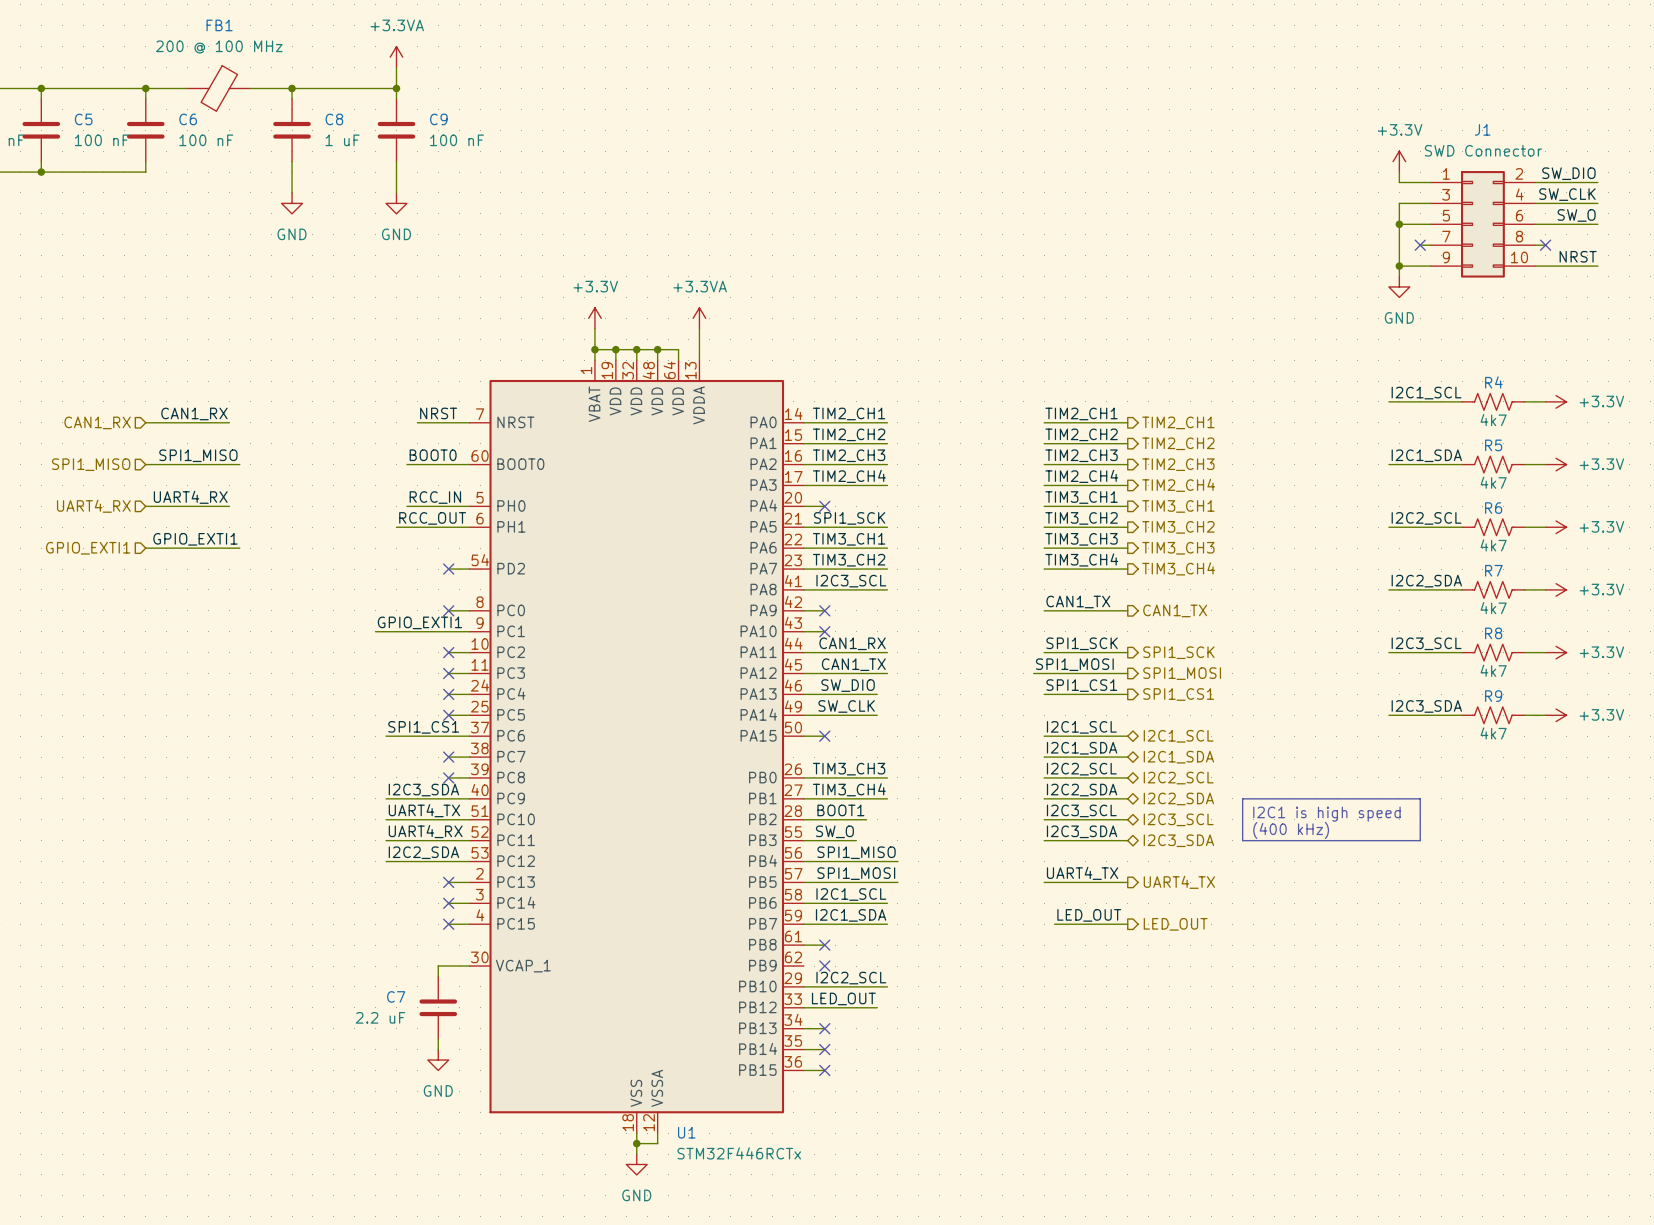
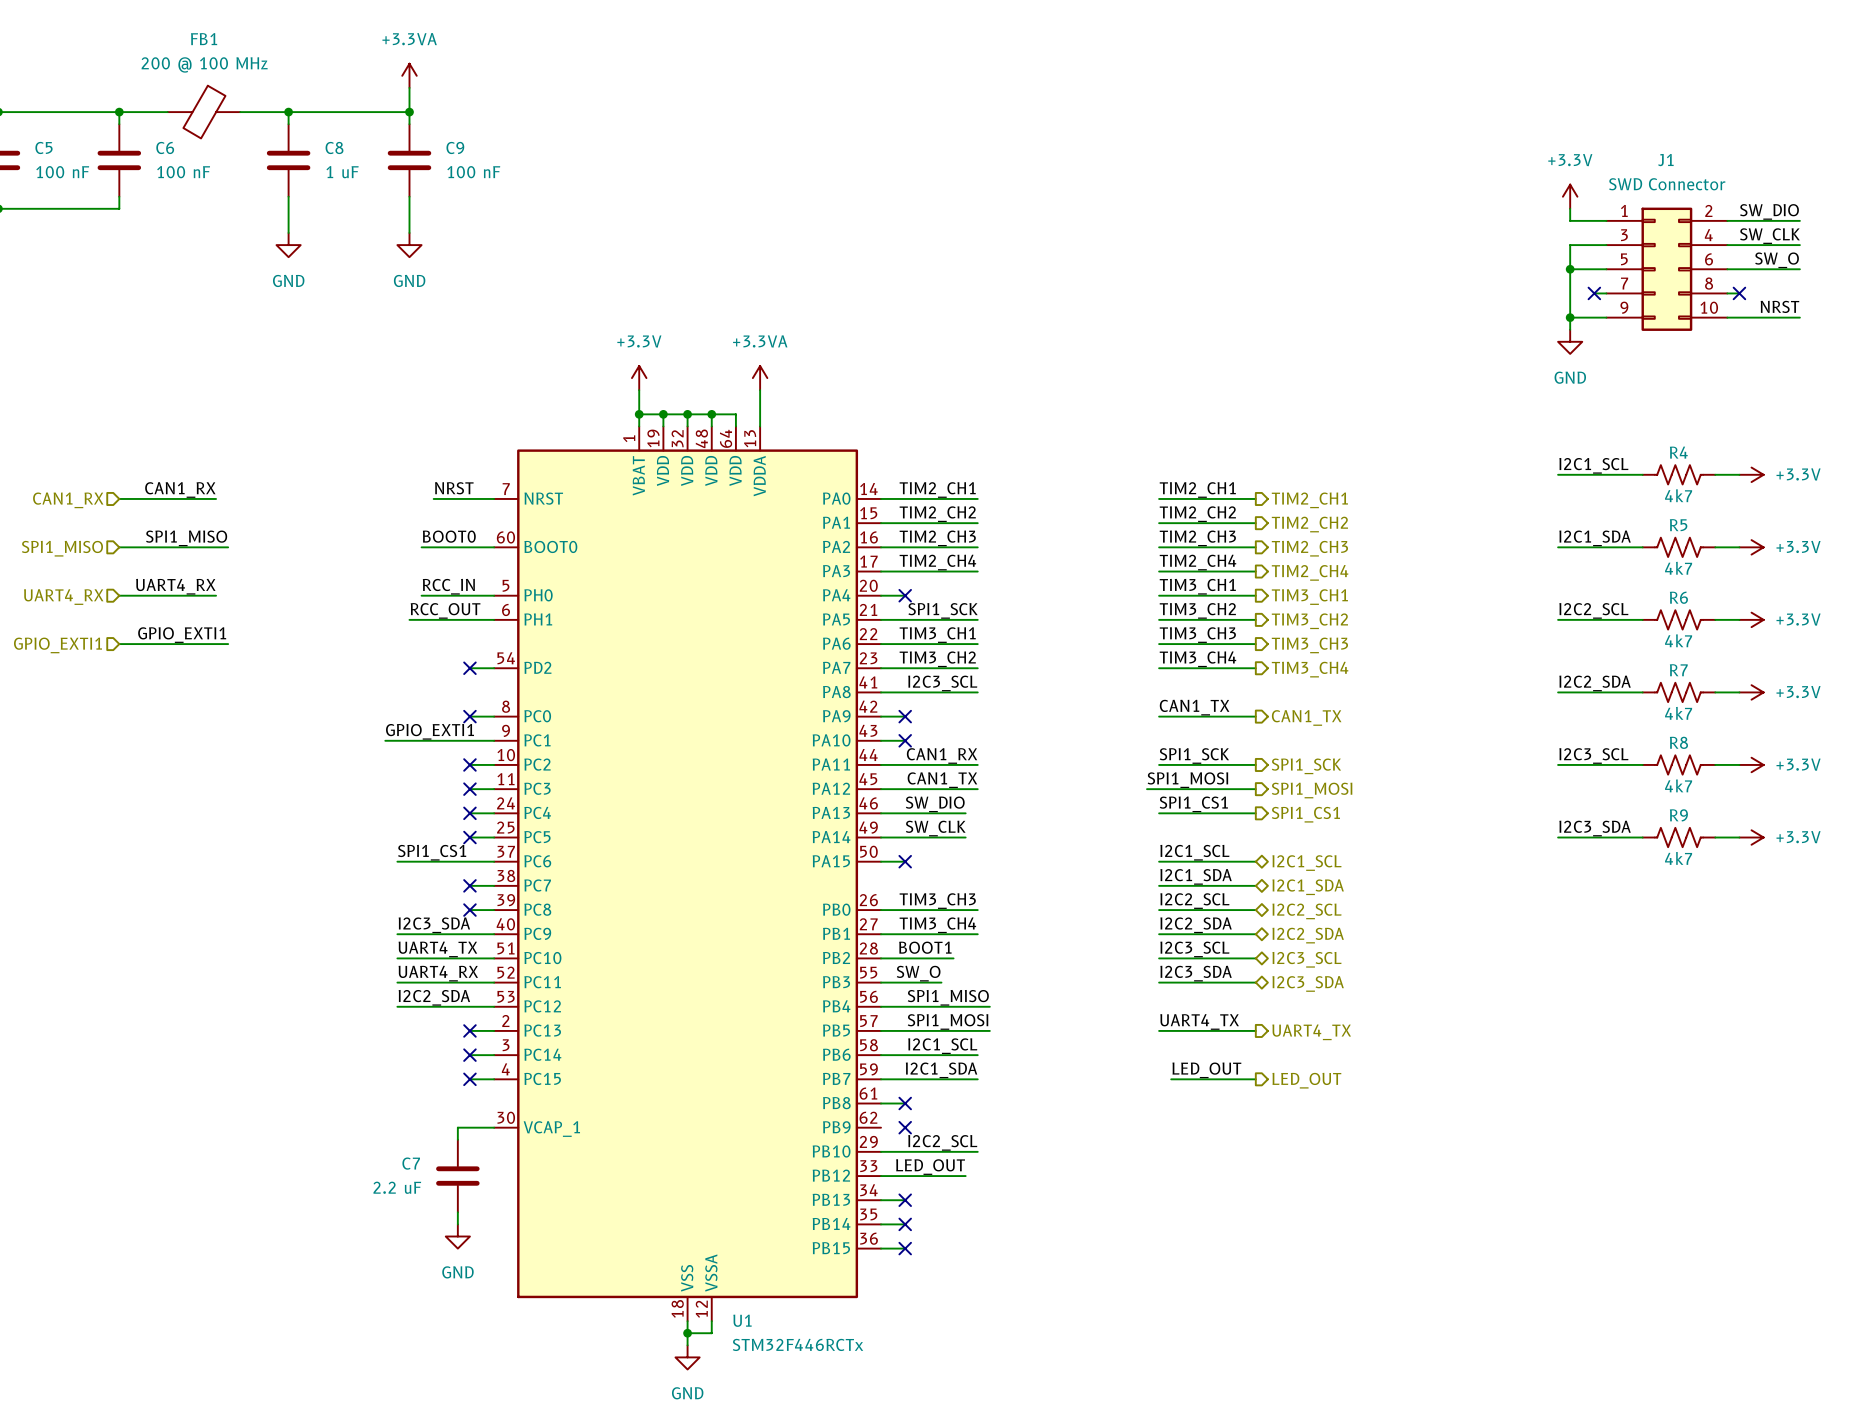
line: (1242, 798) (1420, 798) (1420, 840) (1242, 840) (1242, 798) -> none
text: I2C1 is high speed (1326, 814) -> none
text: (400 kHz) (1291, 830) -> none

